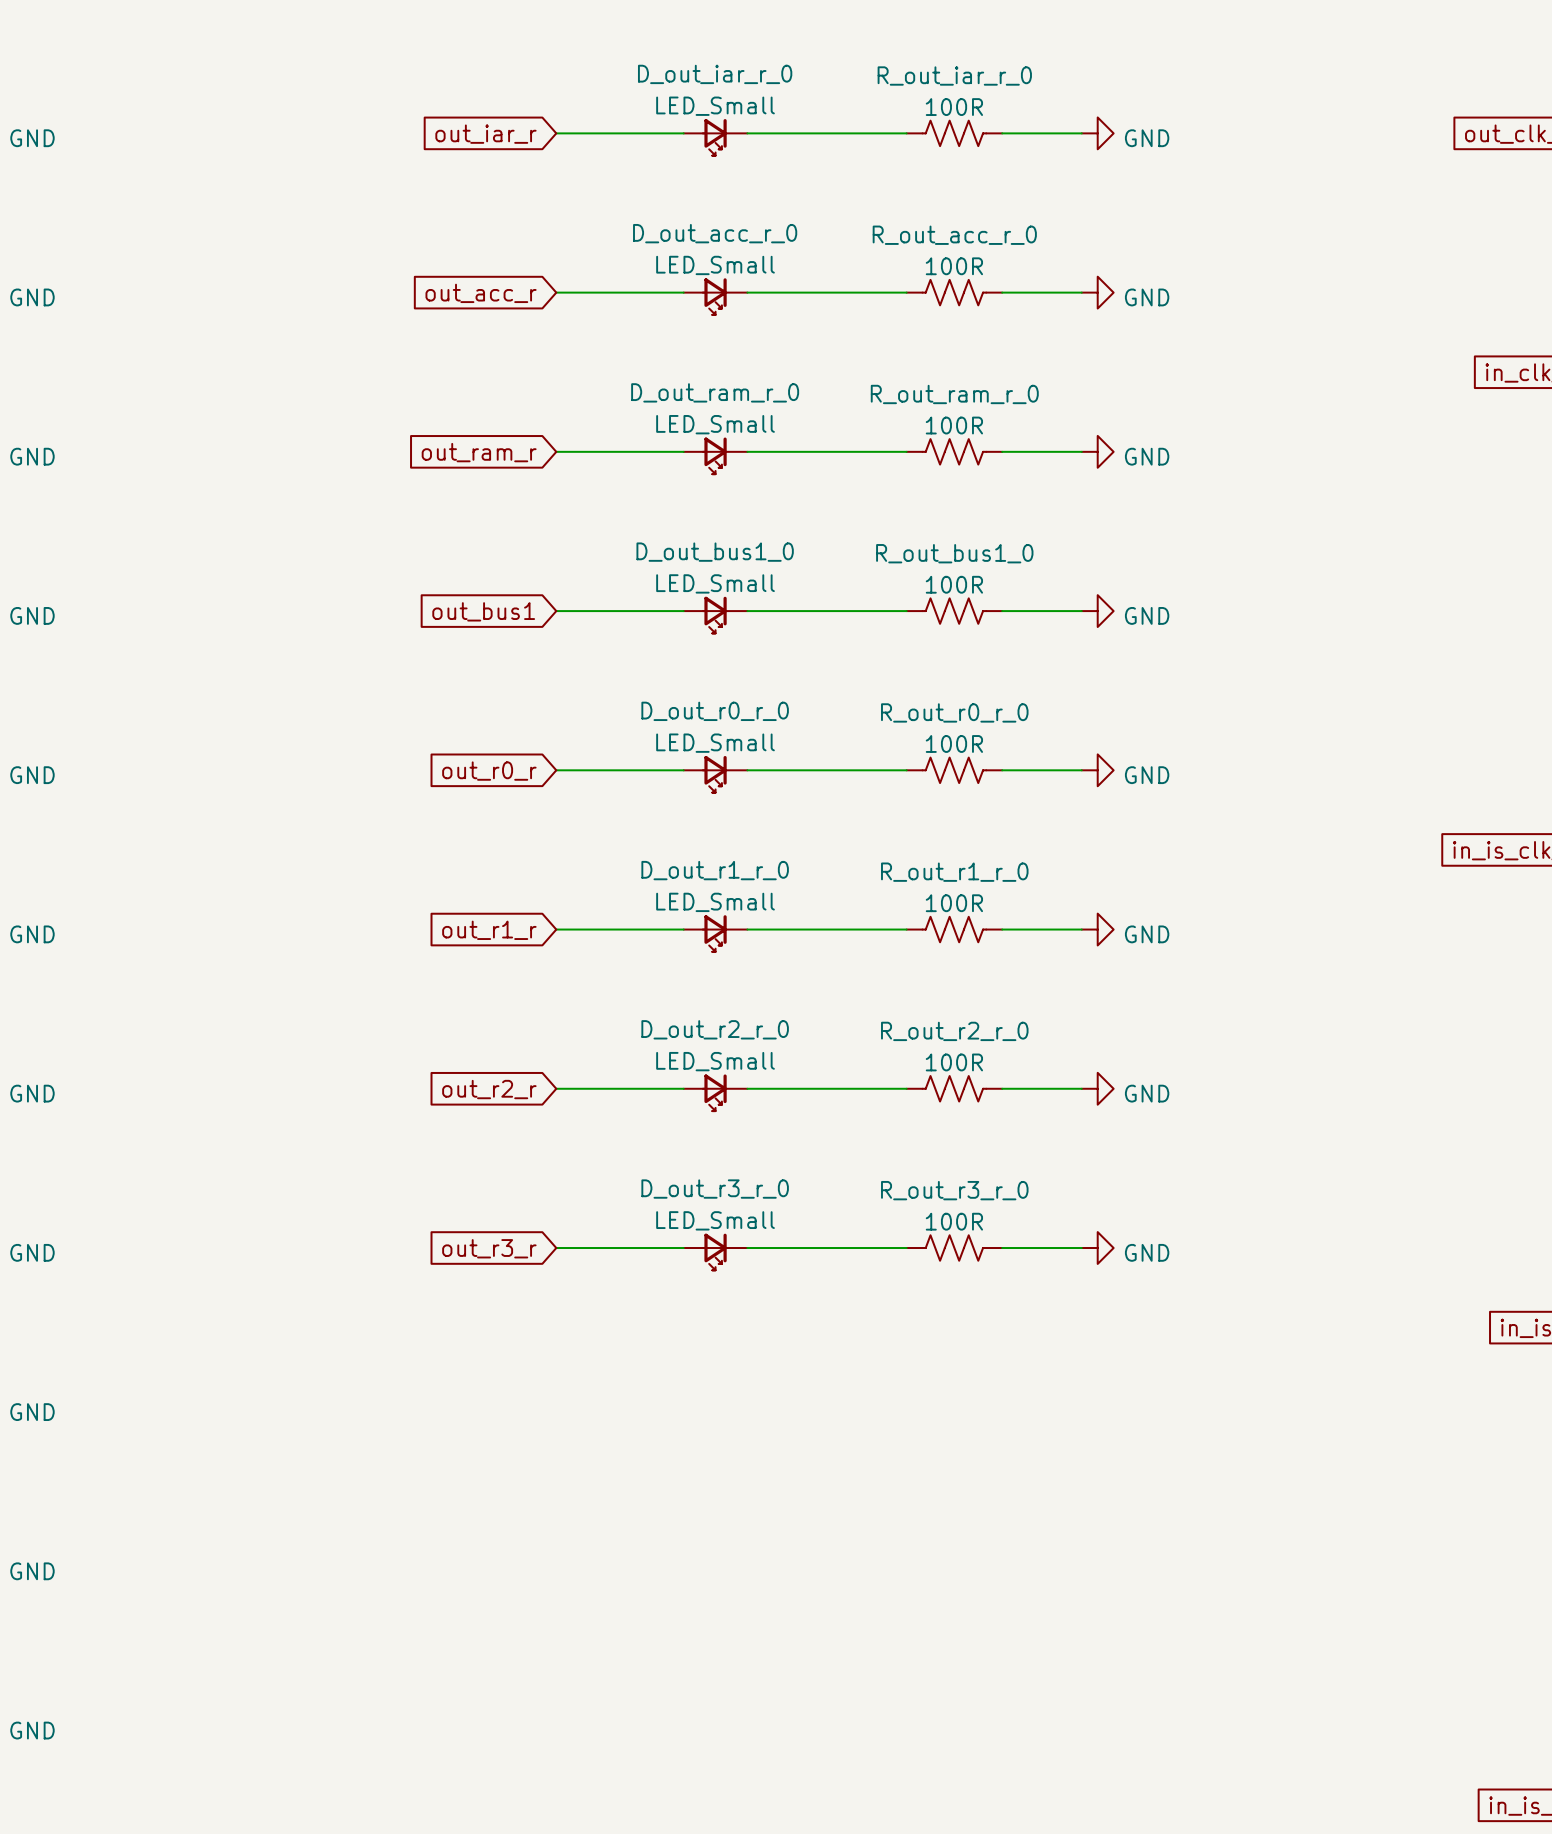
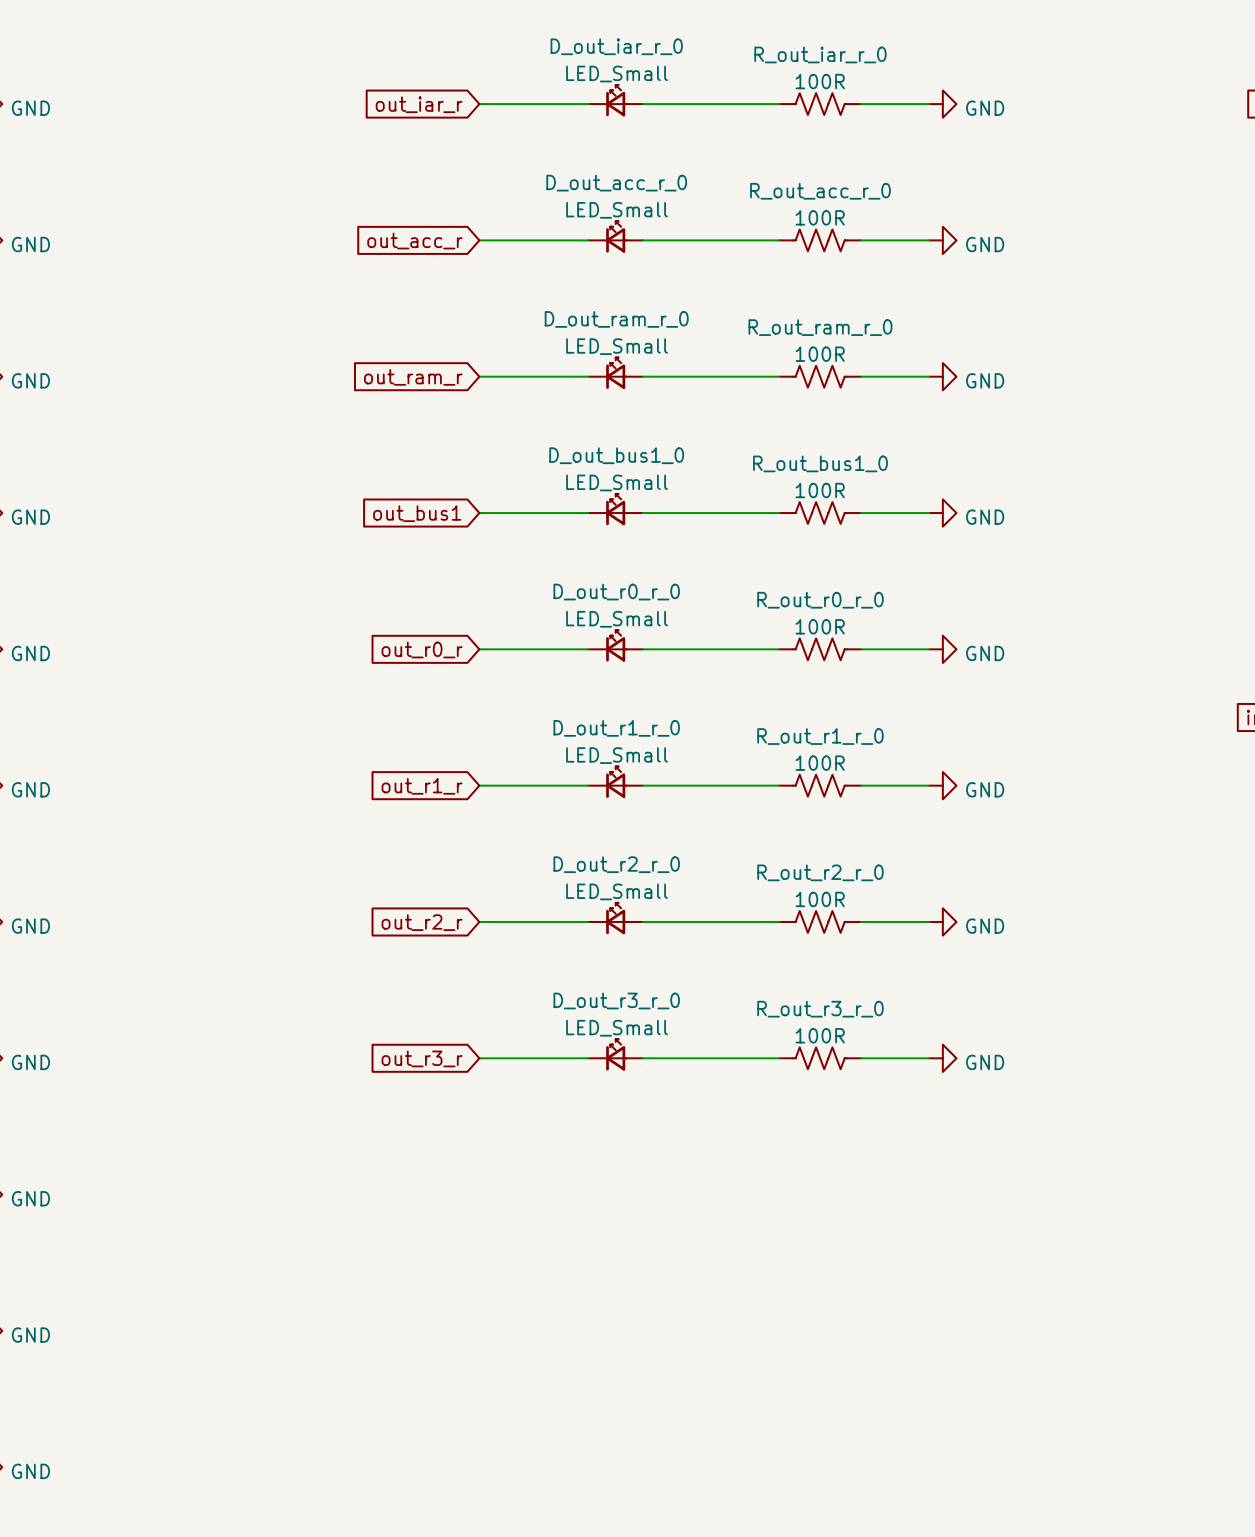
D_out_iar_r_0 rotation: 0° (714, 137) -> 180° (616, 100)
D_out_acc_r_0 rotation: 0° (714, 296) -> 180° (616, 236)
D_out_ram_r_0 rotation: 0° (714, 455) -> 180° (616, 373)
D_out_bus1_0 rotation: 0° (714, 615) -> 180° (616, 509)
D_out_r0_r_0 rotation: 0° (714, 774) -> 180° (616, 645)
D_out_r1_r_0 rotation: 0° (714, 933) -> 180° (616, 782)
D_out_r2_r_0 rotation: 0° (714, 1092) -> 180° (616, 918)
D_out_r3_r_0 rotation: 0° (714, 1251) -> 180° (616, 1054)

